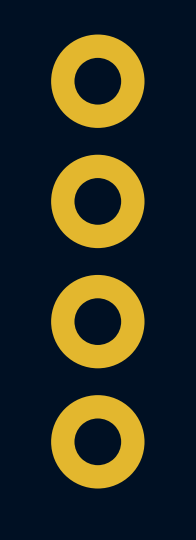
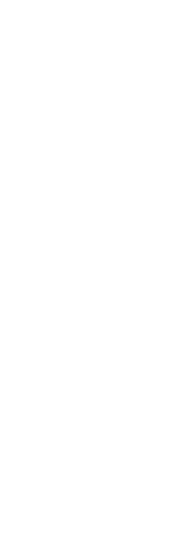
part: (97, 81) -> none
part: (97, 201) -> none
part: (97, 321) -> none
part: (97, 441) -> none

